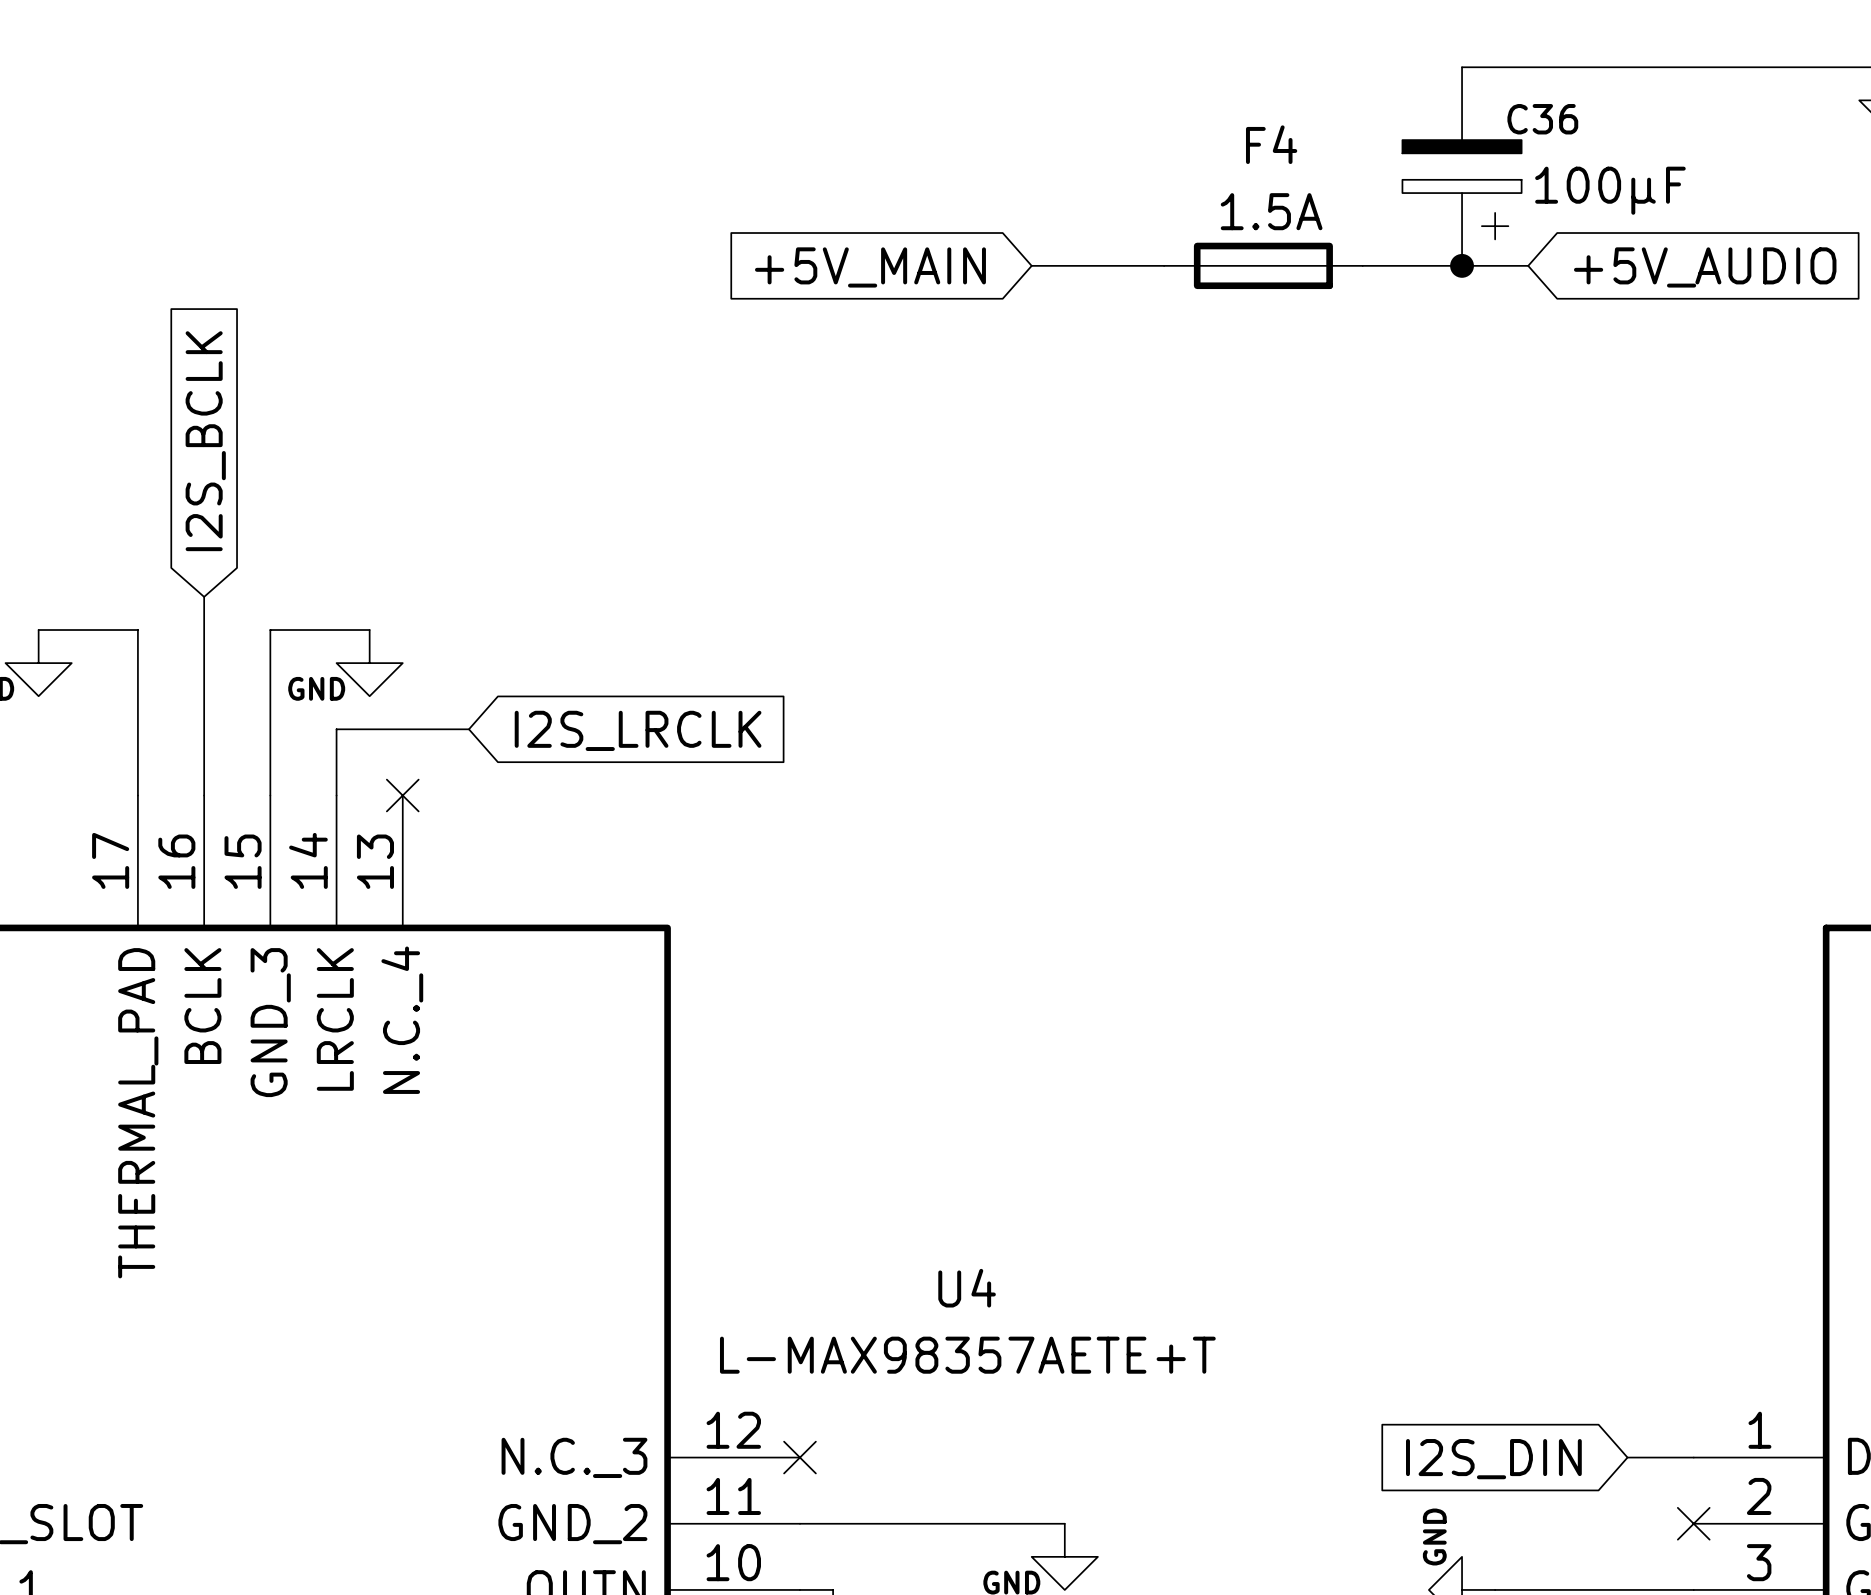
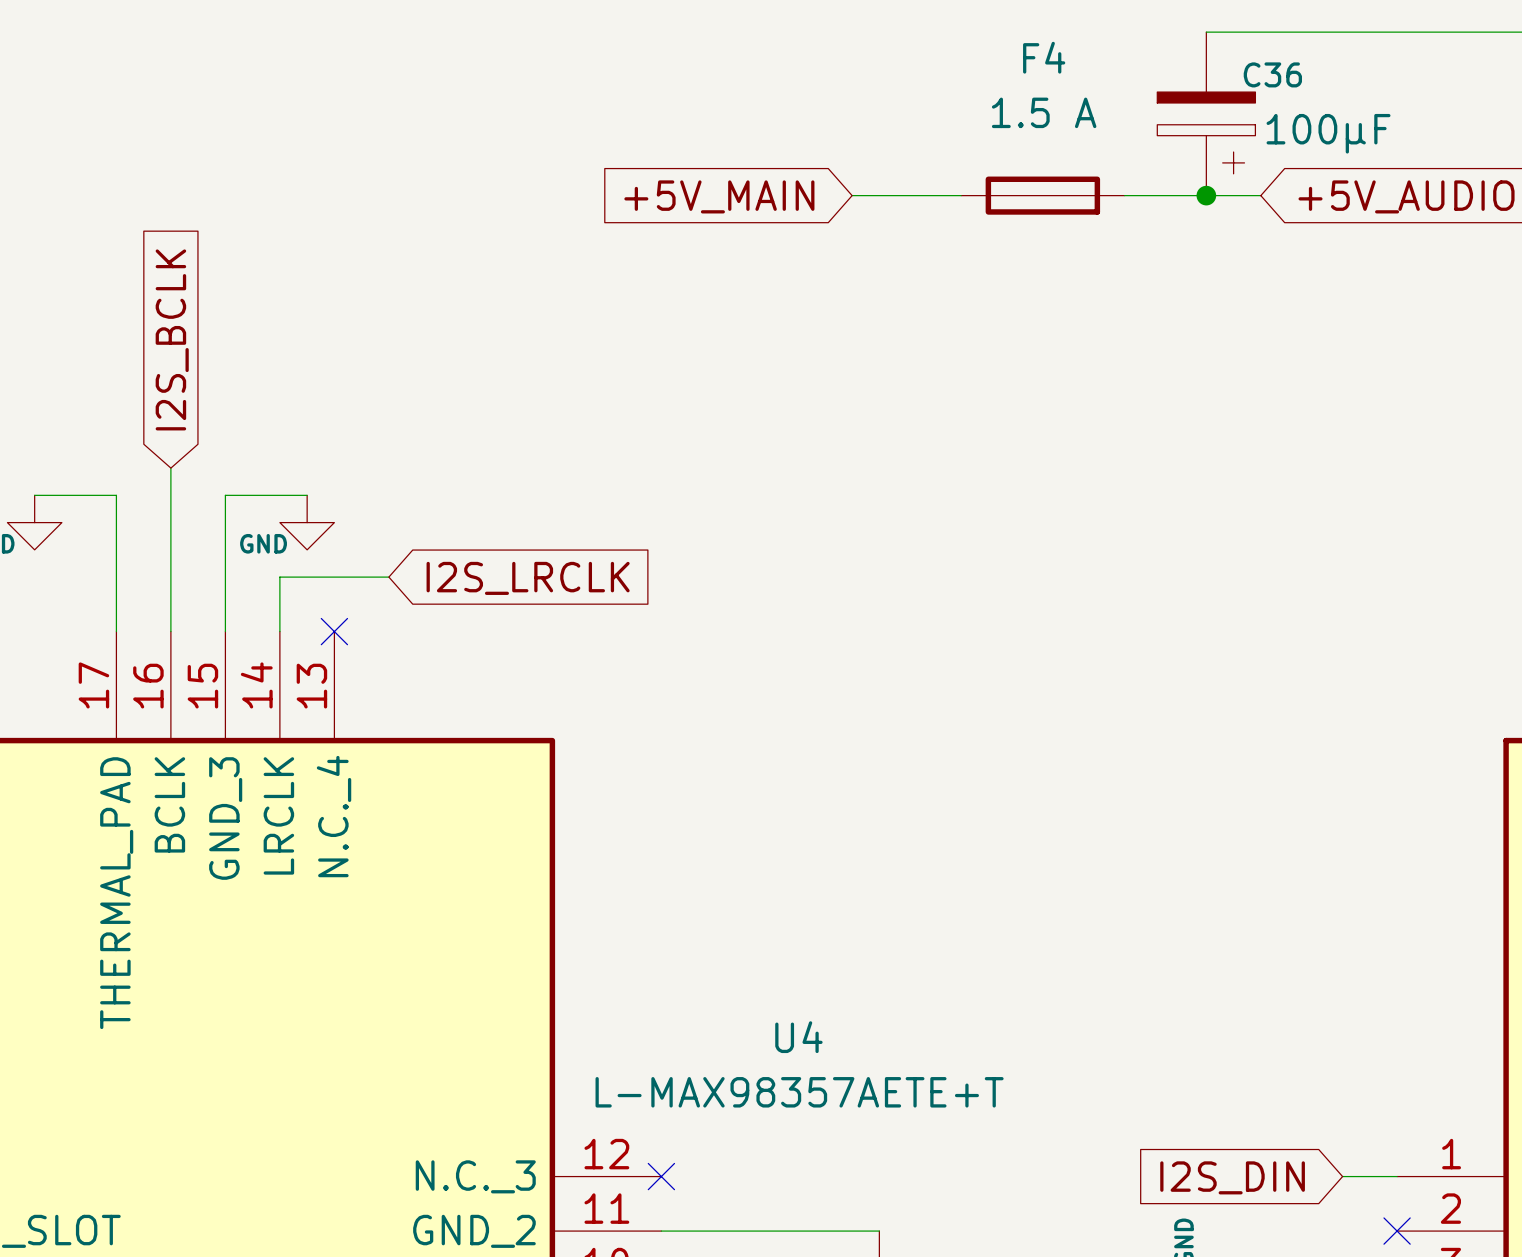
F4 name position: F4 (1271, 144) -> F4 (1044, 57)
F4 value: 1.5A (1271, 211) -> 1.5 A (1044, 112)

